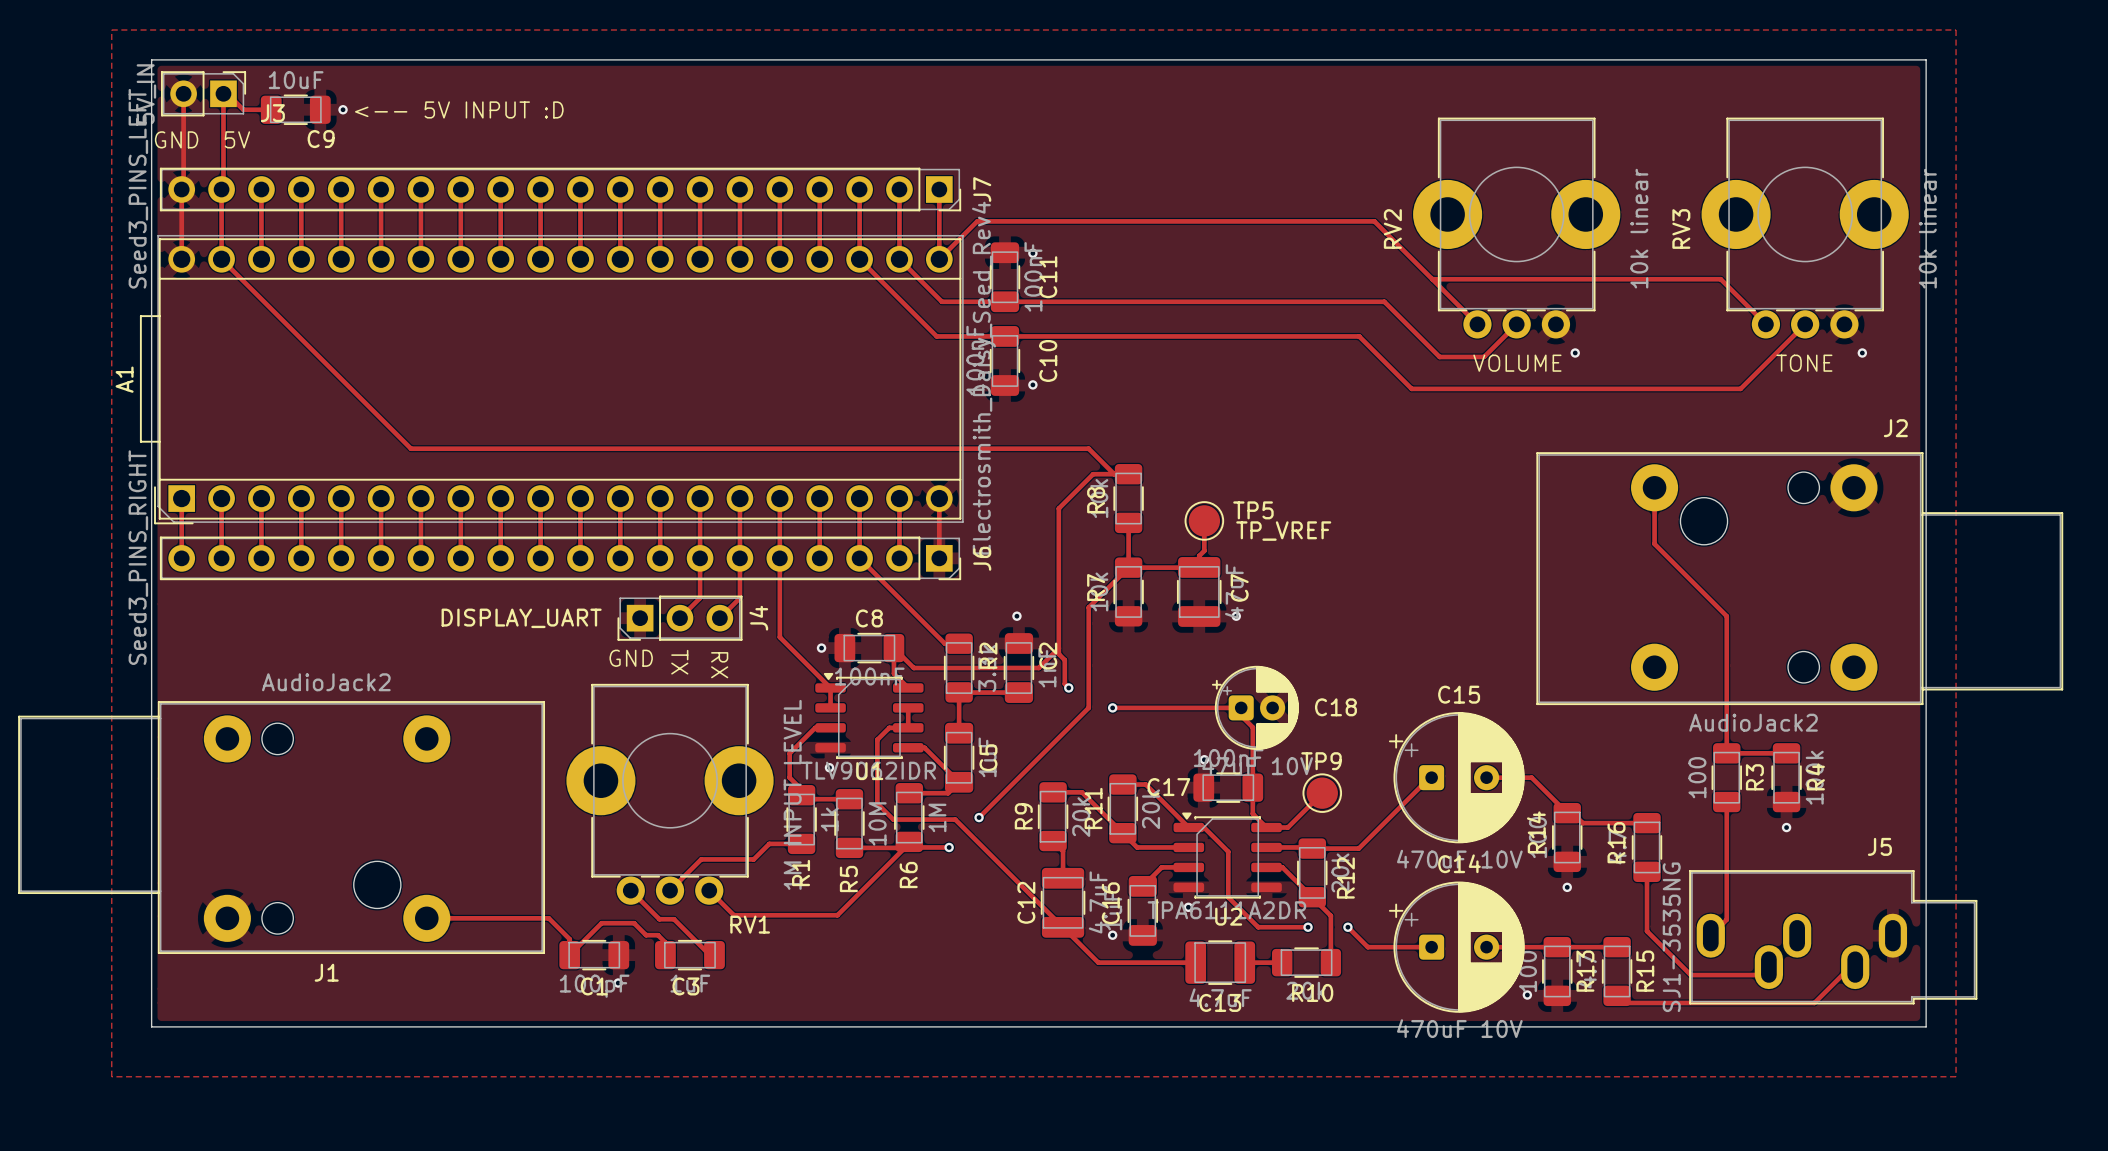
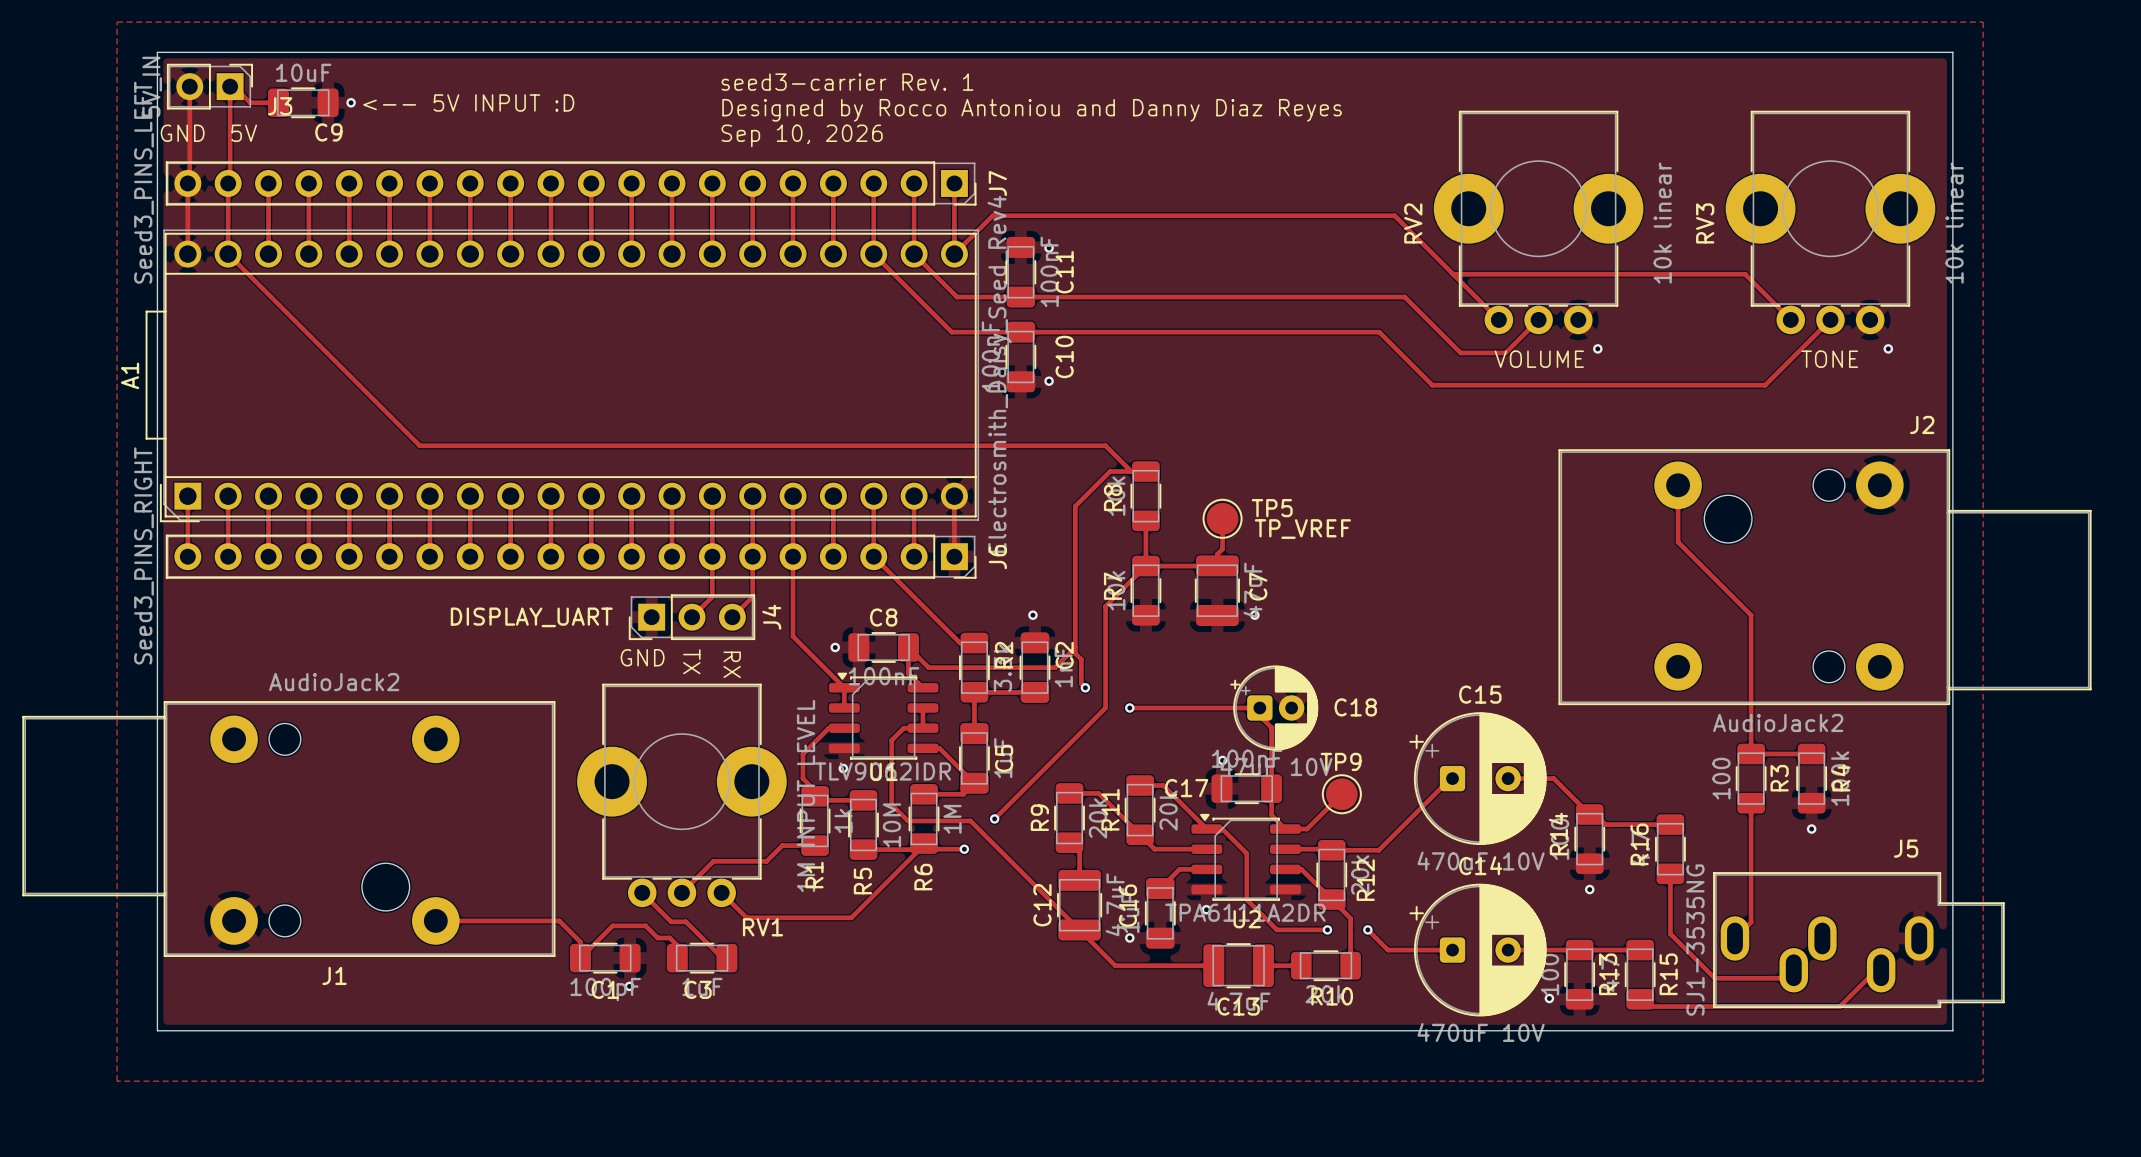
text: none -> seed3-carrier Rev. 1 (847, 82)
text: none -> Designed by Rocco Antoniou and Danny Diaz Reyes (1032, 110)
text: none -> Sep 10, 2026 (802, 135)

